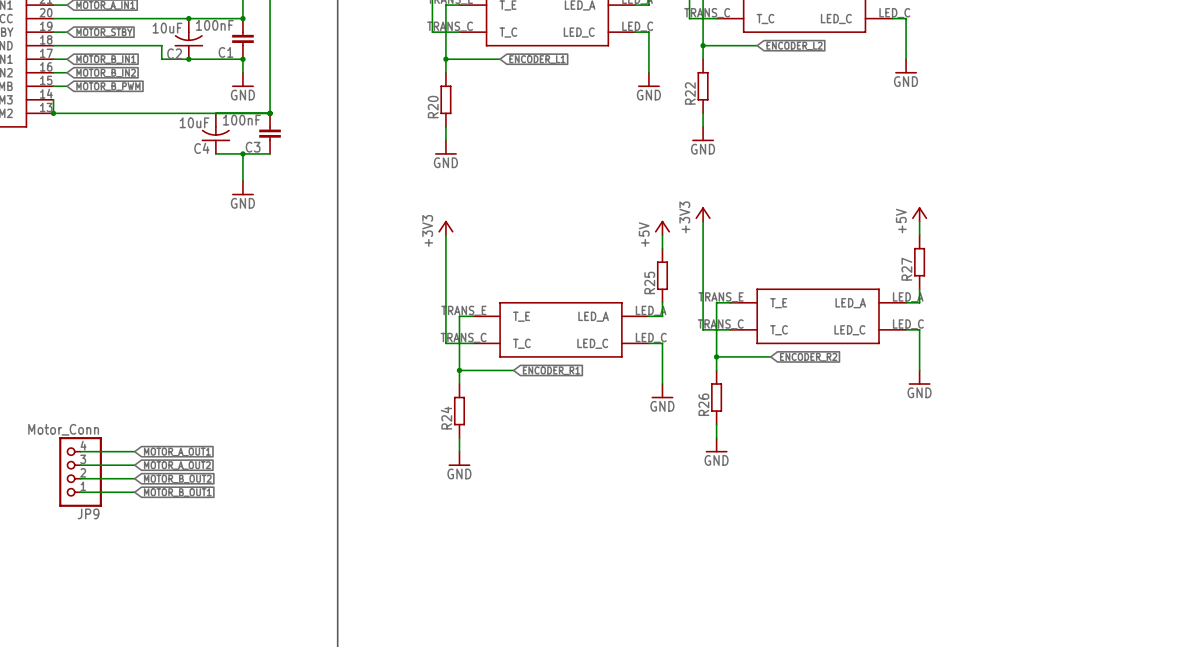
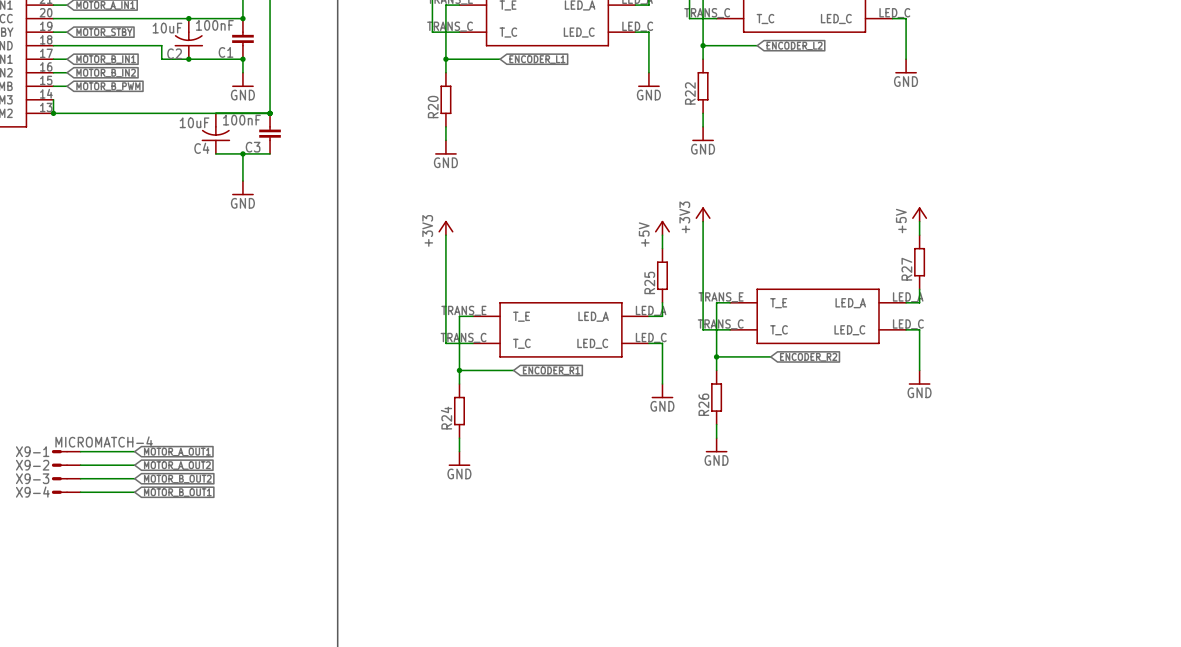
X9-1: none -> MICROMATCH-4 (66, 451)
X9-2: none -> (66, 465)
JP9: Motor_Conn (80, 471) -> none
X9-3: none -> (66, 478)
X9-4: none -> (66, 492)

